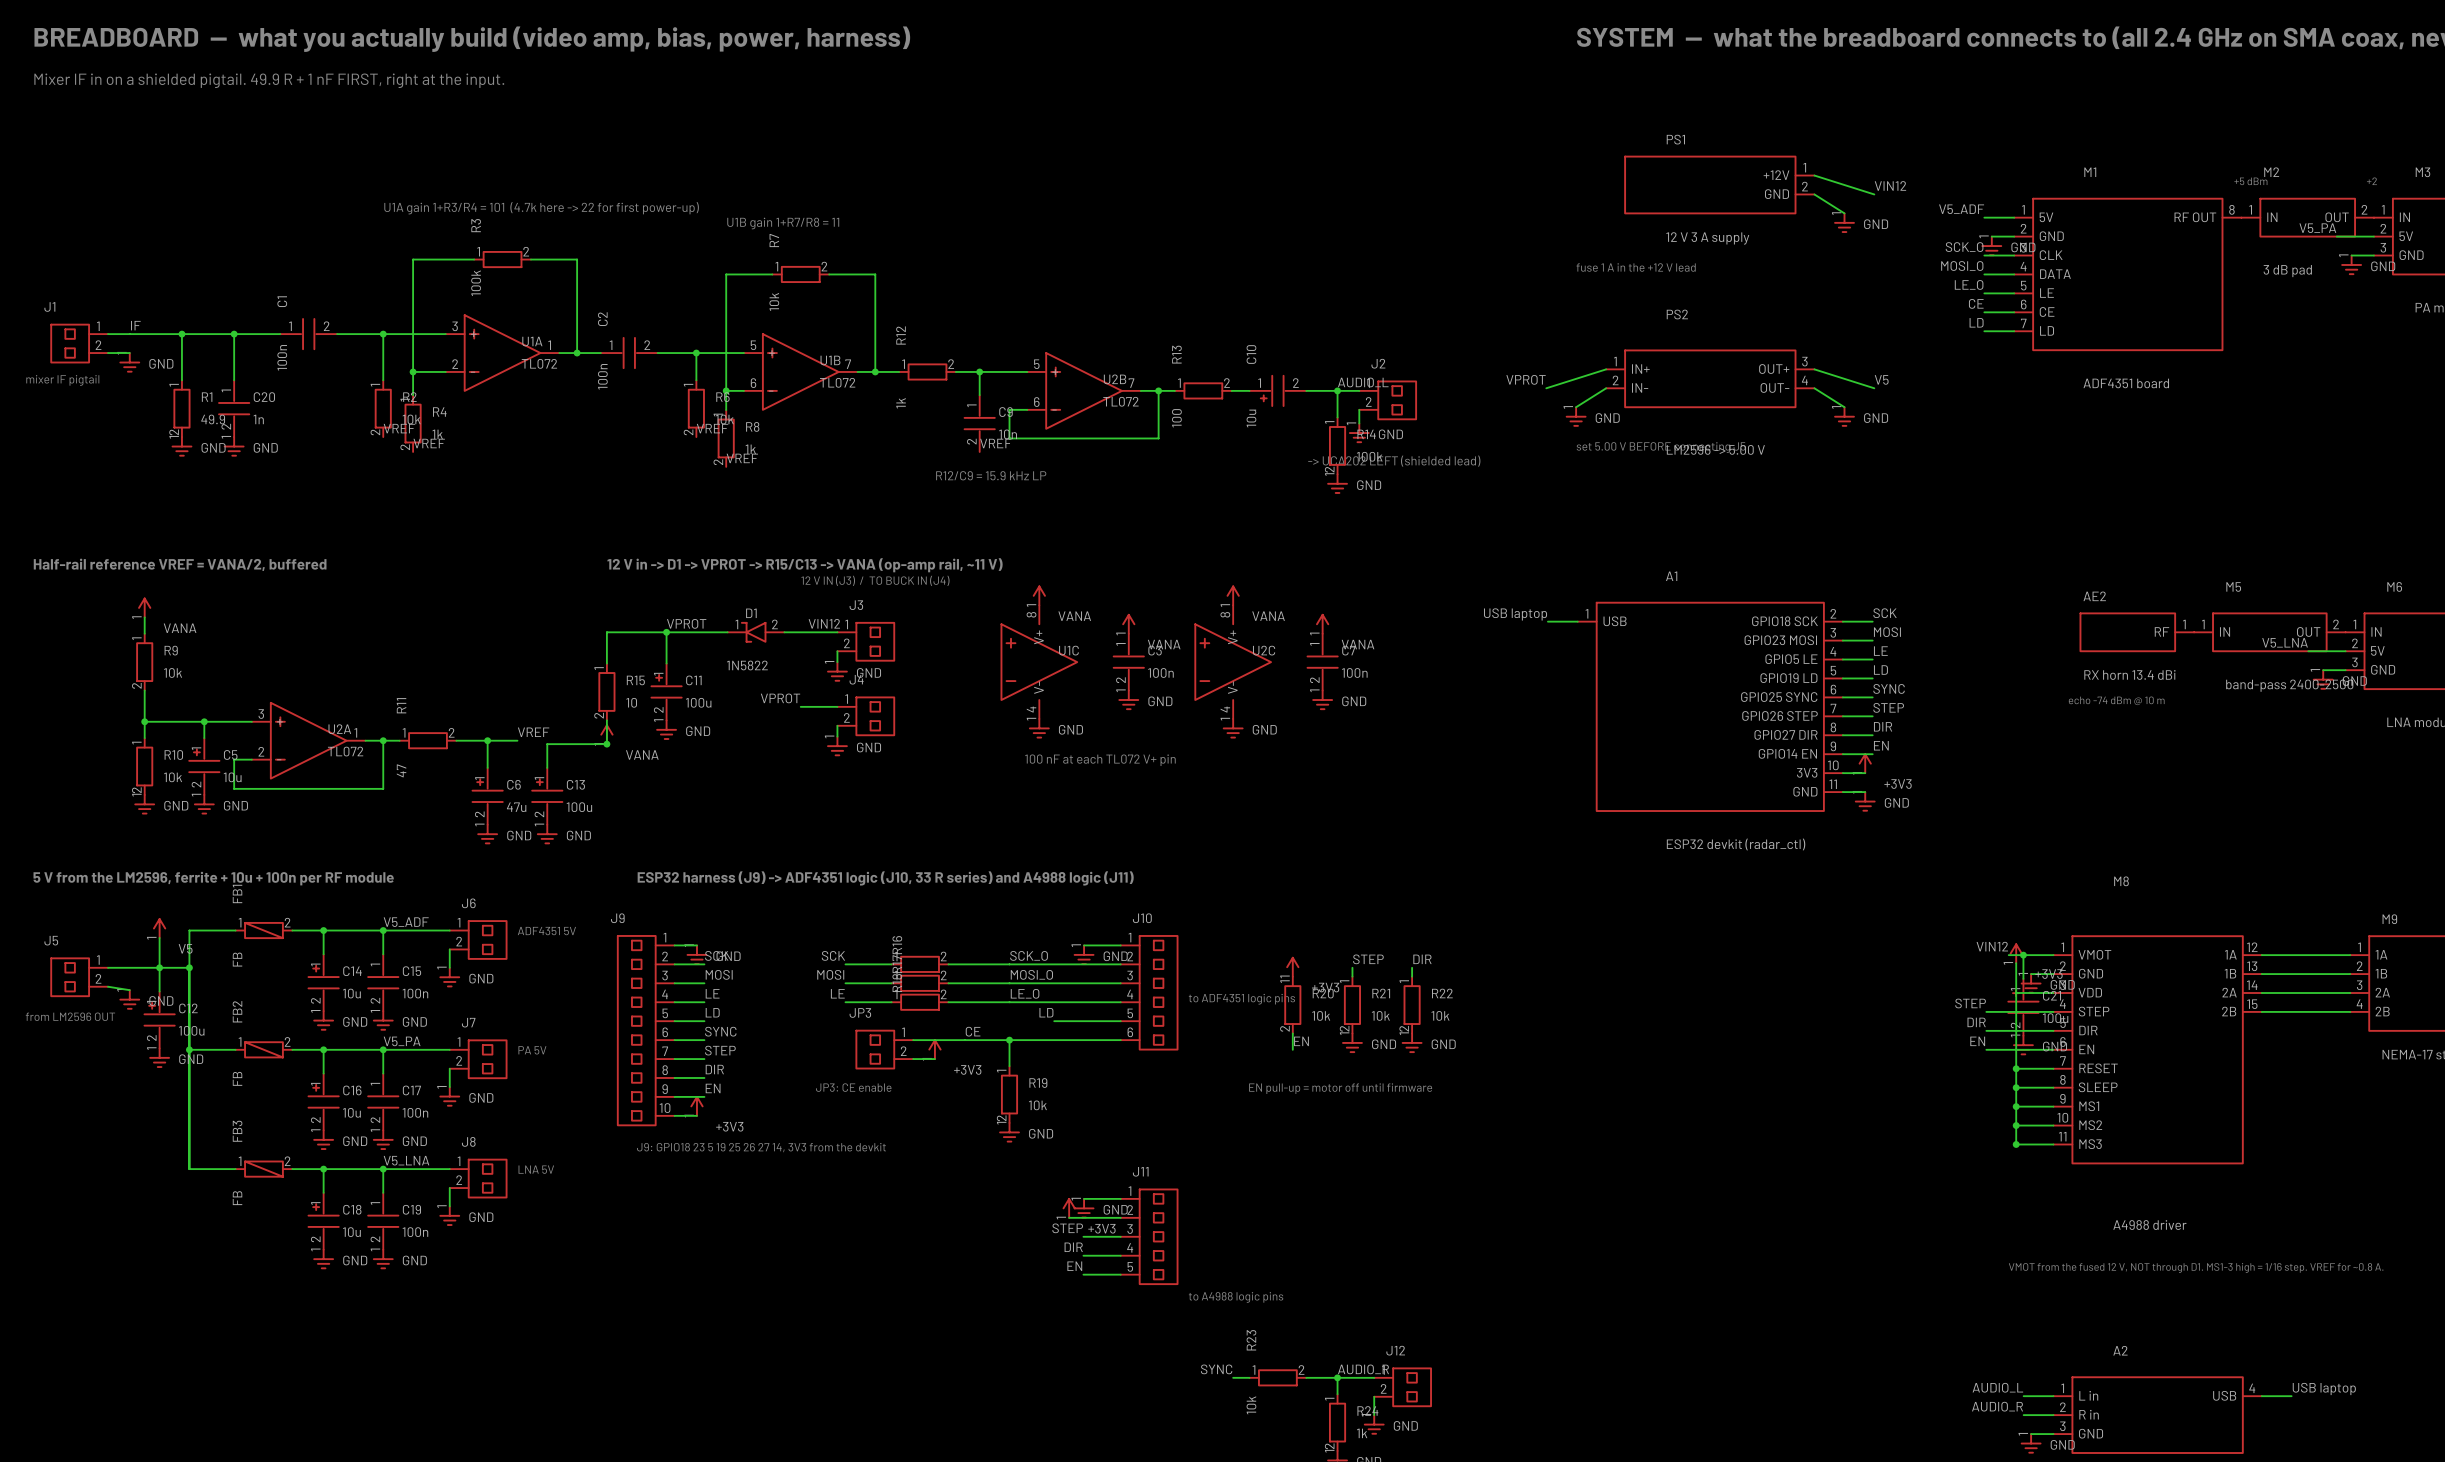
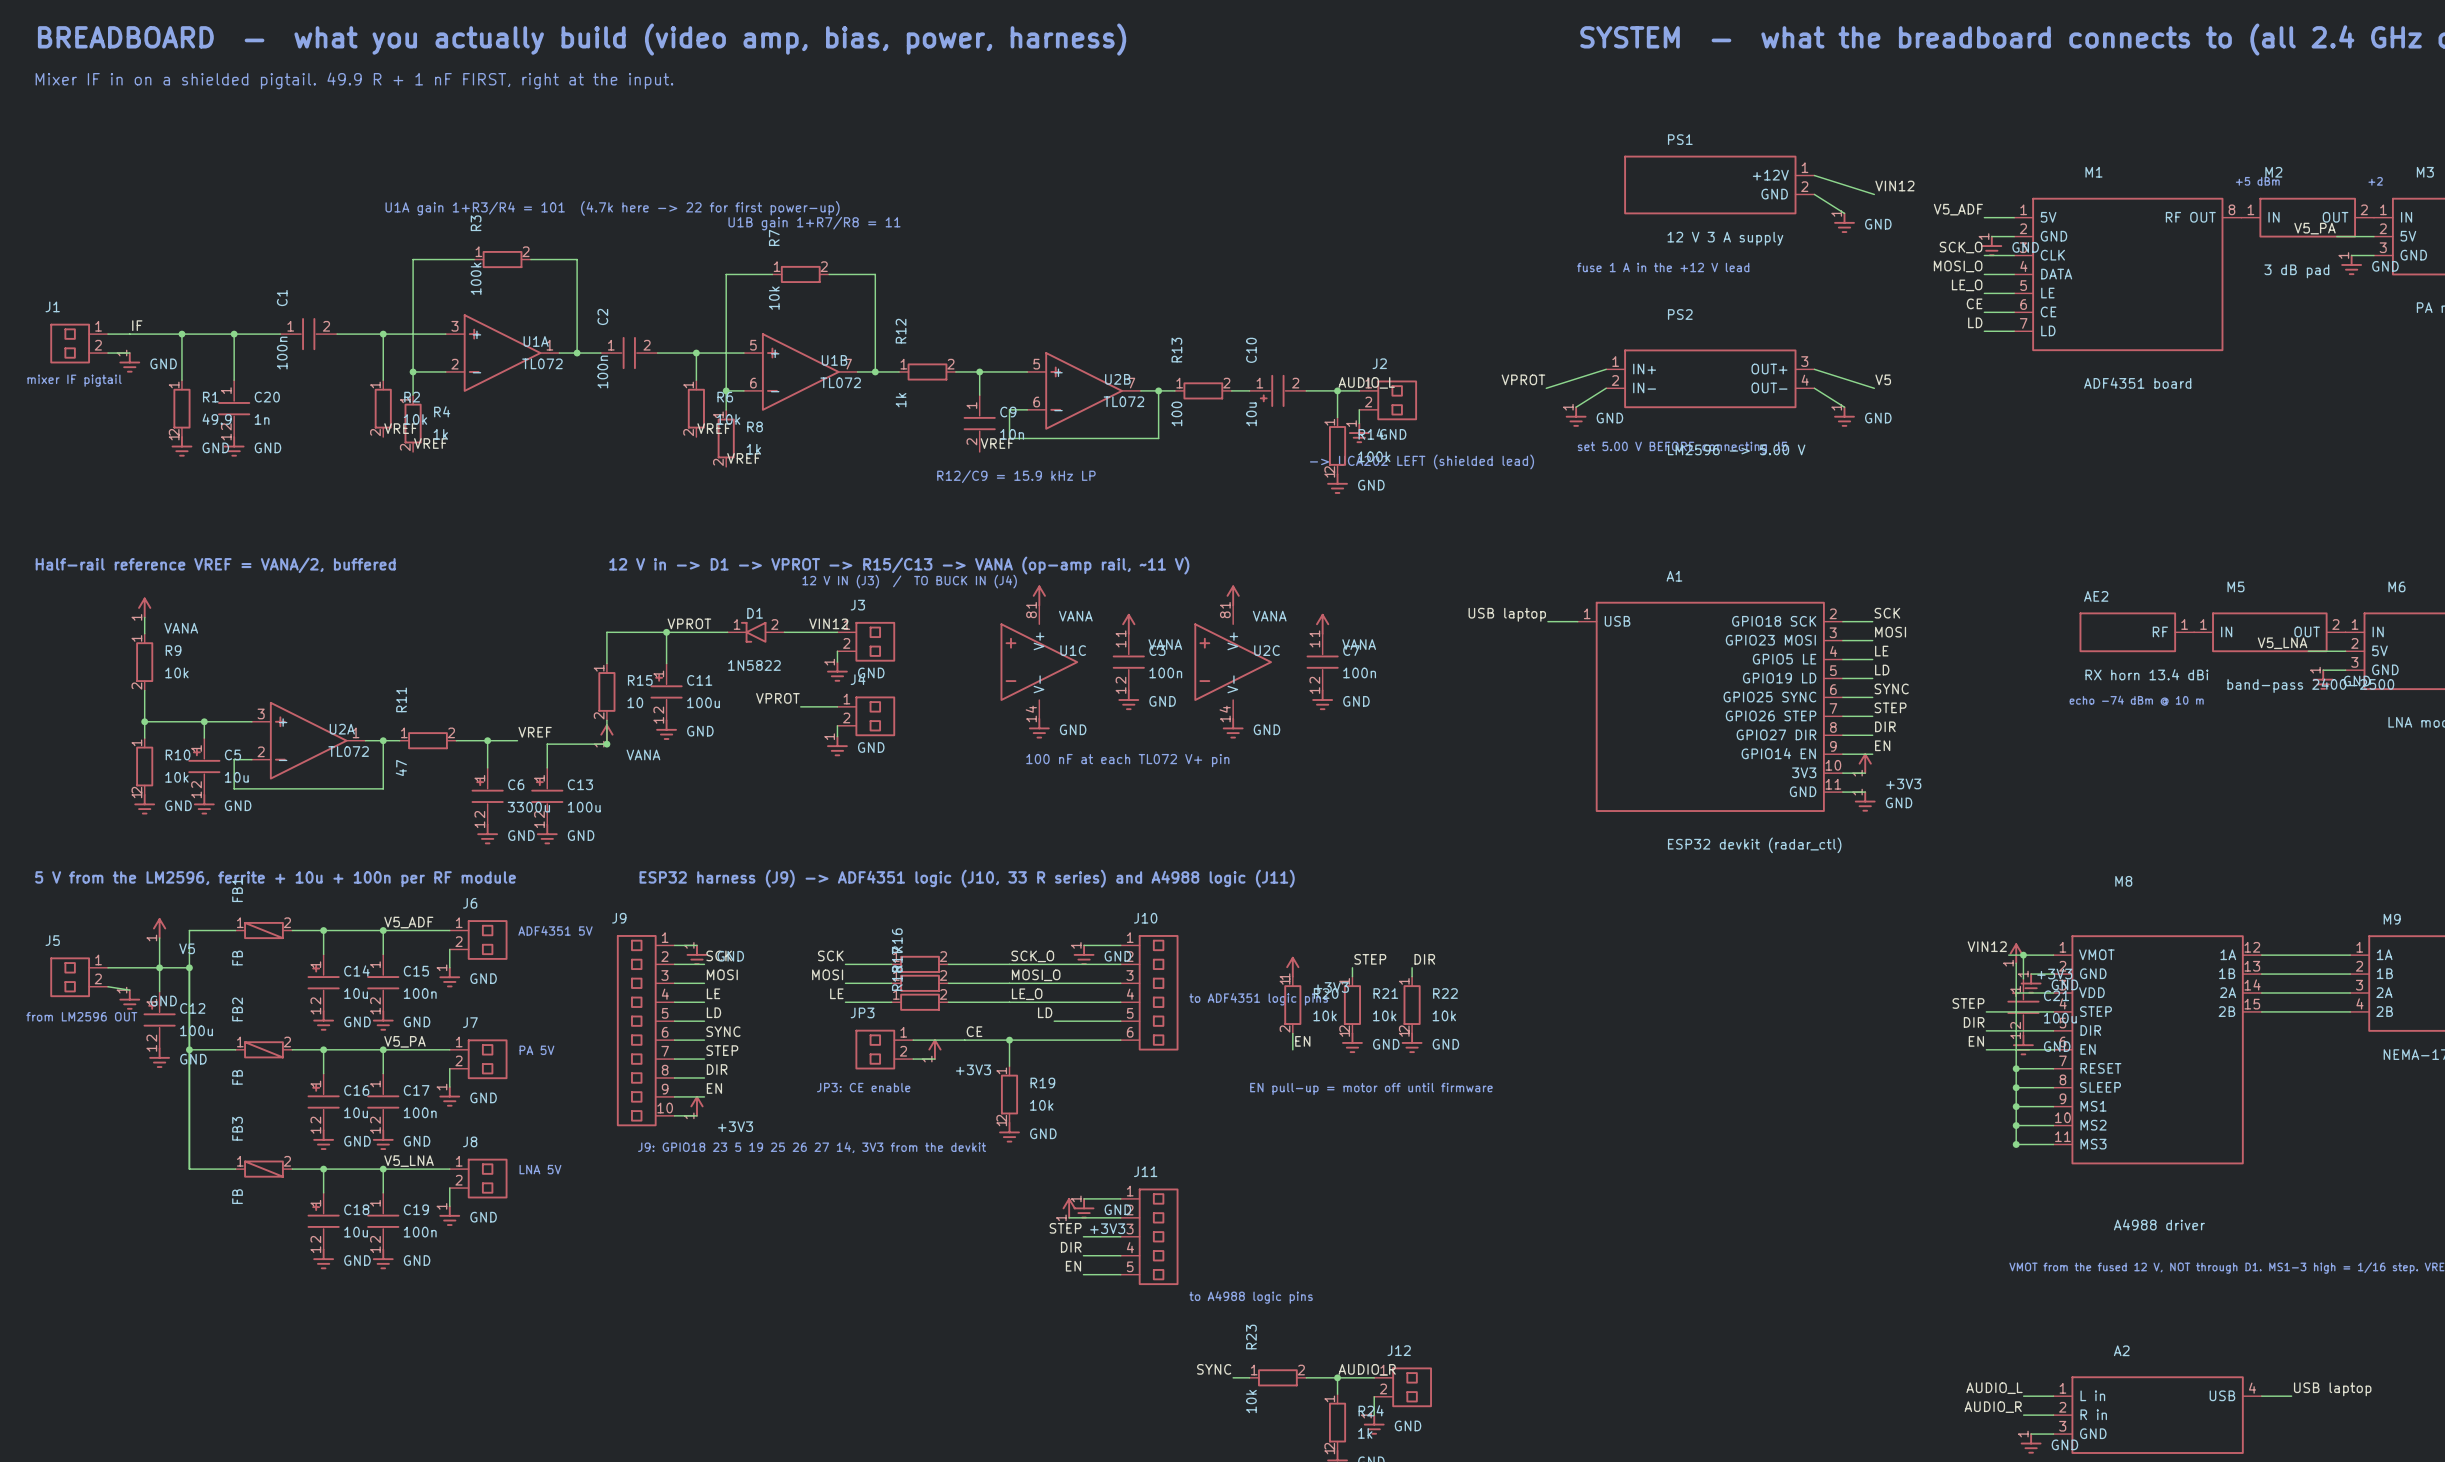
C6 value: 47u (516, 807) -> 3300u (528, 807)

